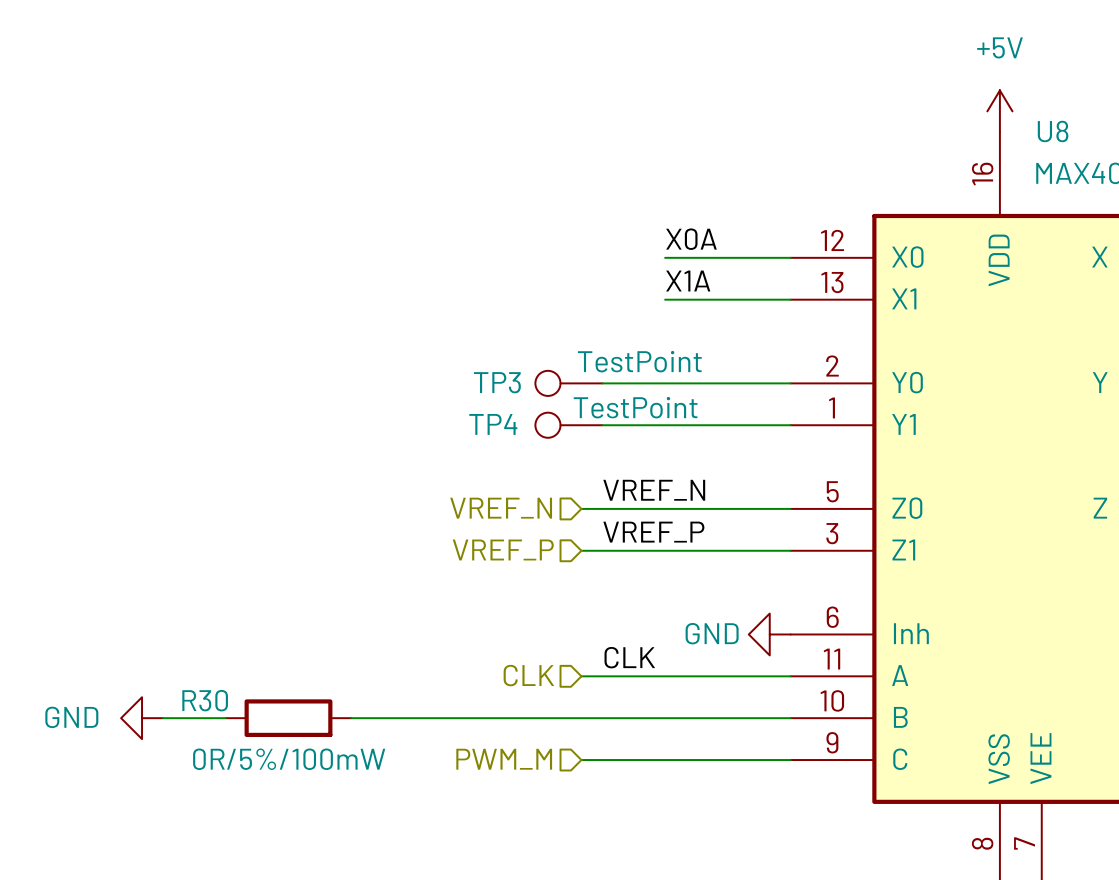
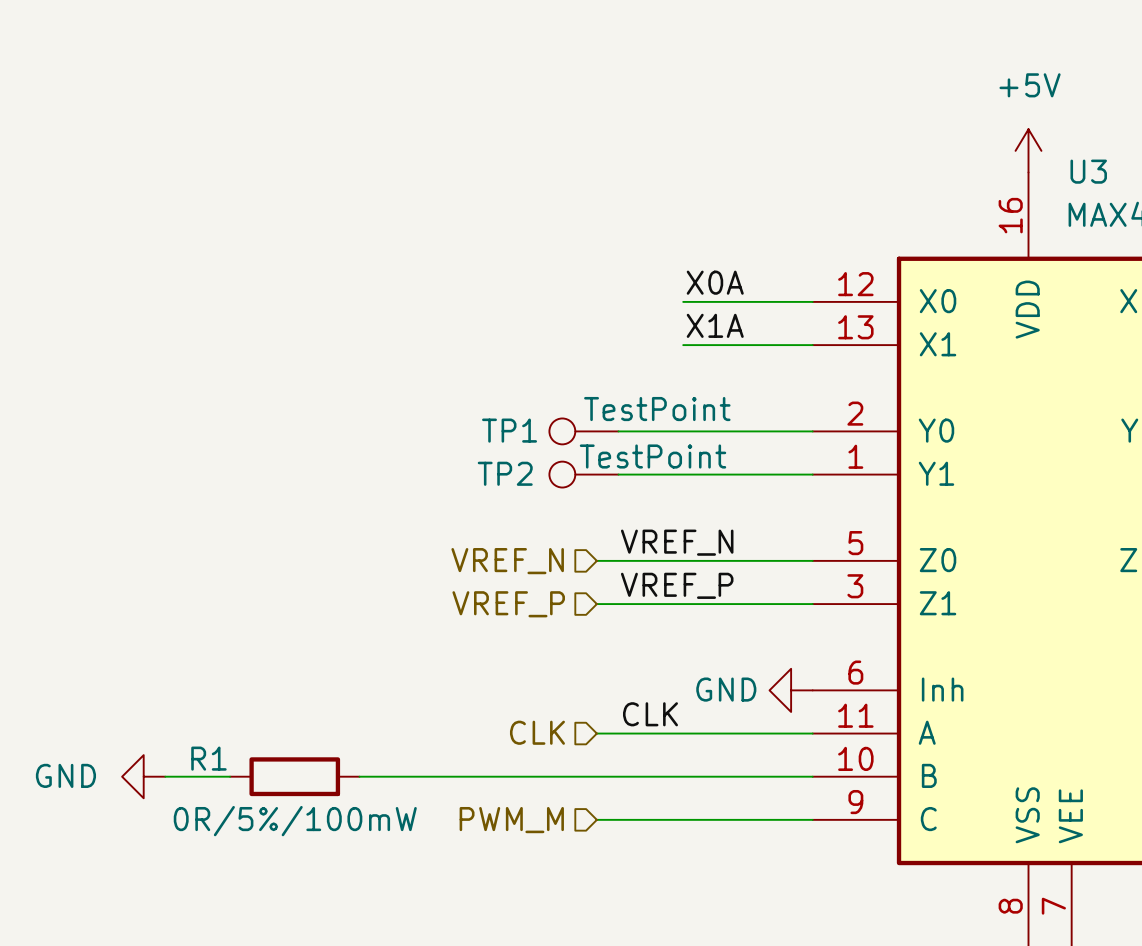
U8 name: U8 (1053, 131) -> U3 (1088, 171)
TP3 name: TP3 (497, 382) -> TP1 (509, 430)
TP4 name: TP4 (493, 424) -> TP2 (505, 473)
R30 name: R30 (205, 700) -> R1 (208, 758)

